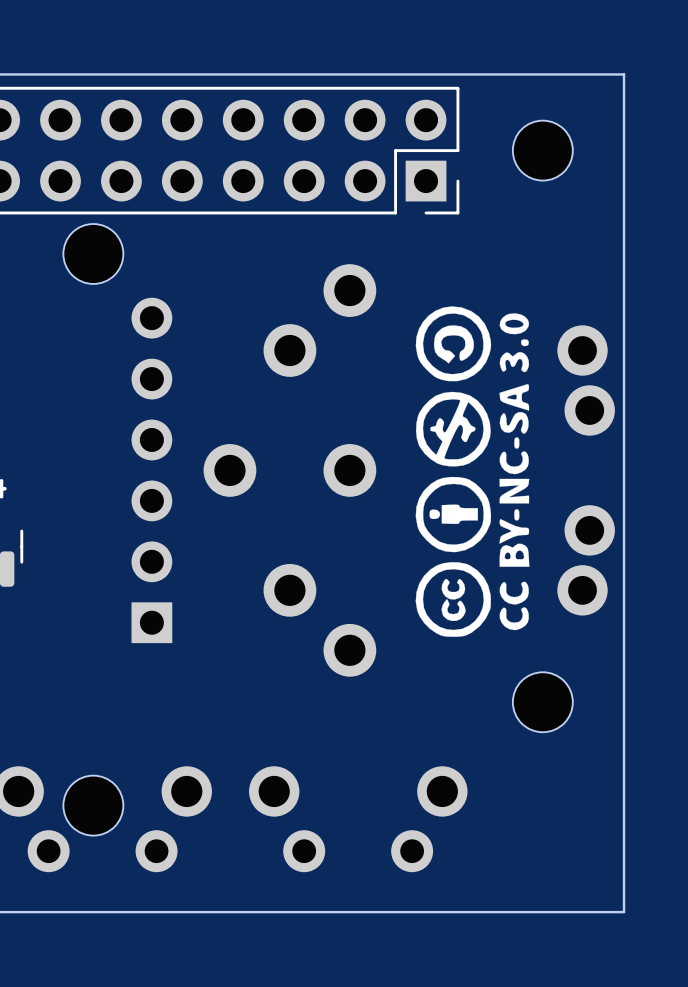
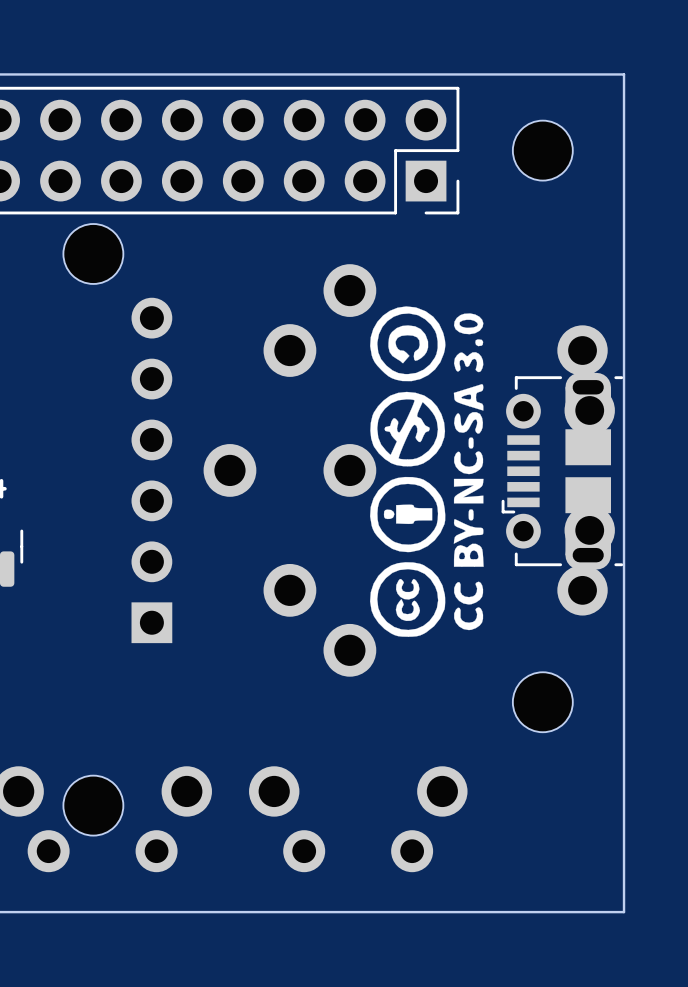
drawing position: (472, 471) -> (426, 471)
part: none -> (562, 471)

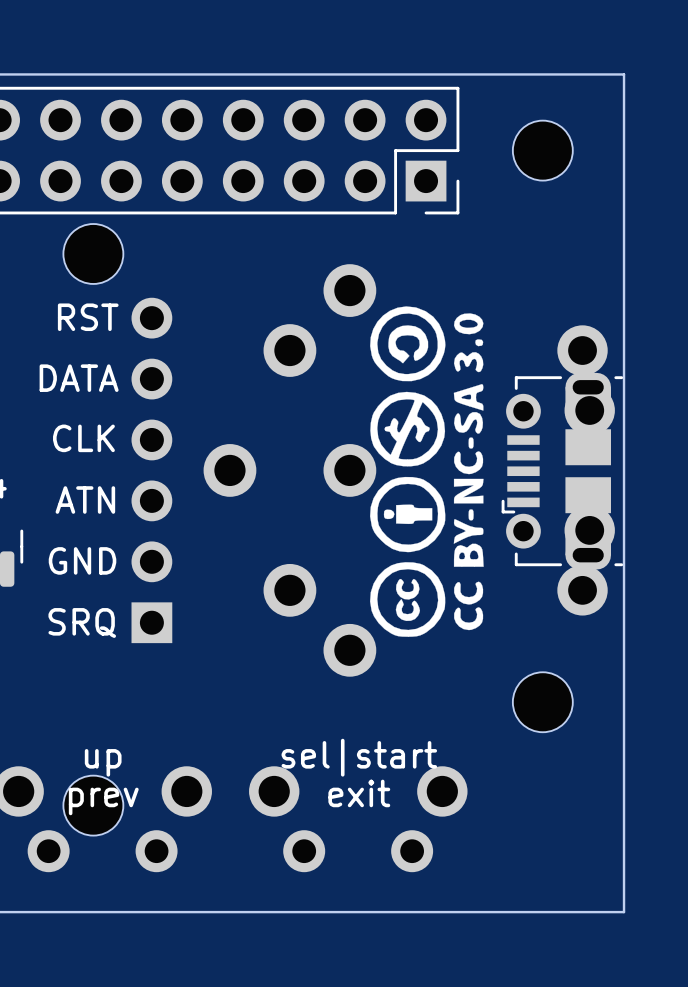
text: none -> RST (88, 317)
text: none -> DATA (79, 378)
text: none -> CLK (83, 438)
text: none -> ATN (85, 500)
text: none -> GND (82, 560)
text: none -> SRQ (82, 622)
text: none -> sel|start (359, 757)
text: none -> up (103, 762)
text: none -> exit (359, 793)
text: none -> prev (103, 801)

